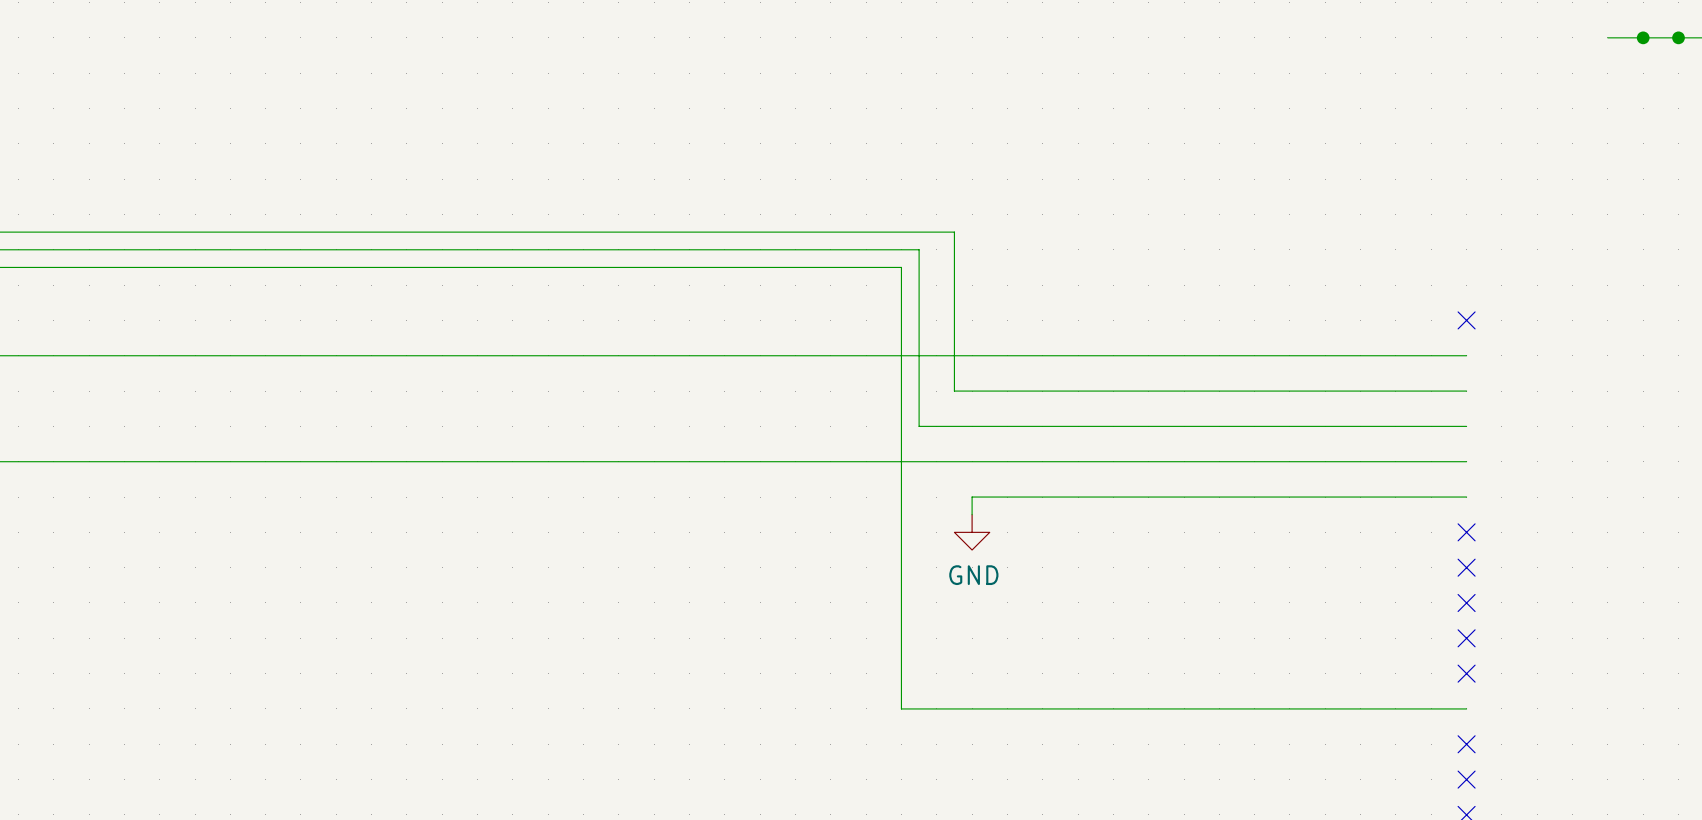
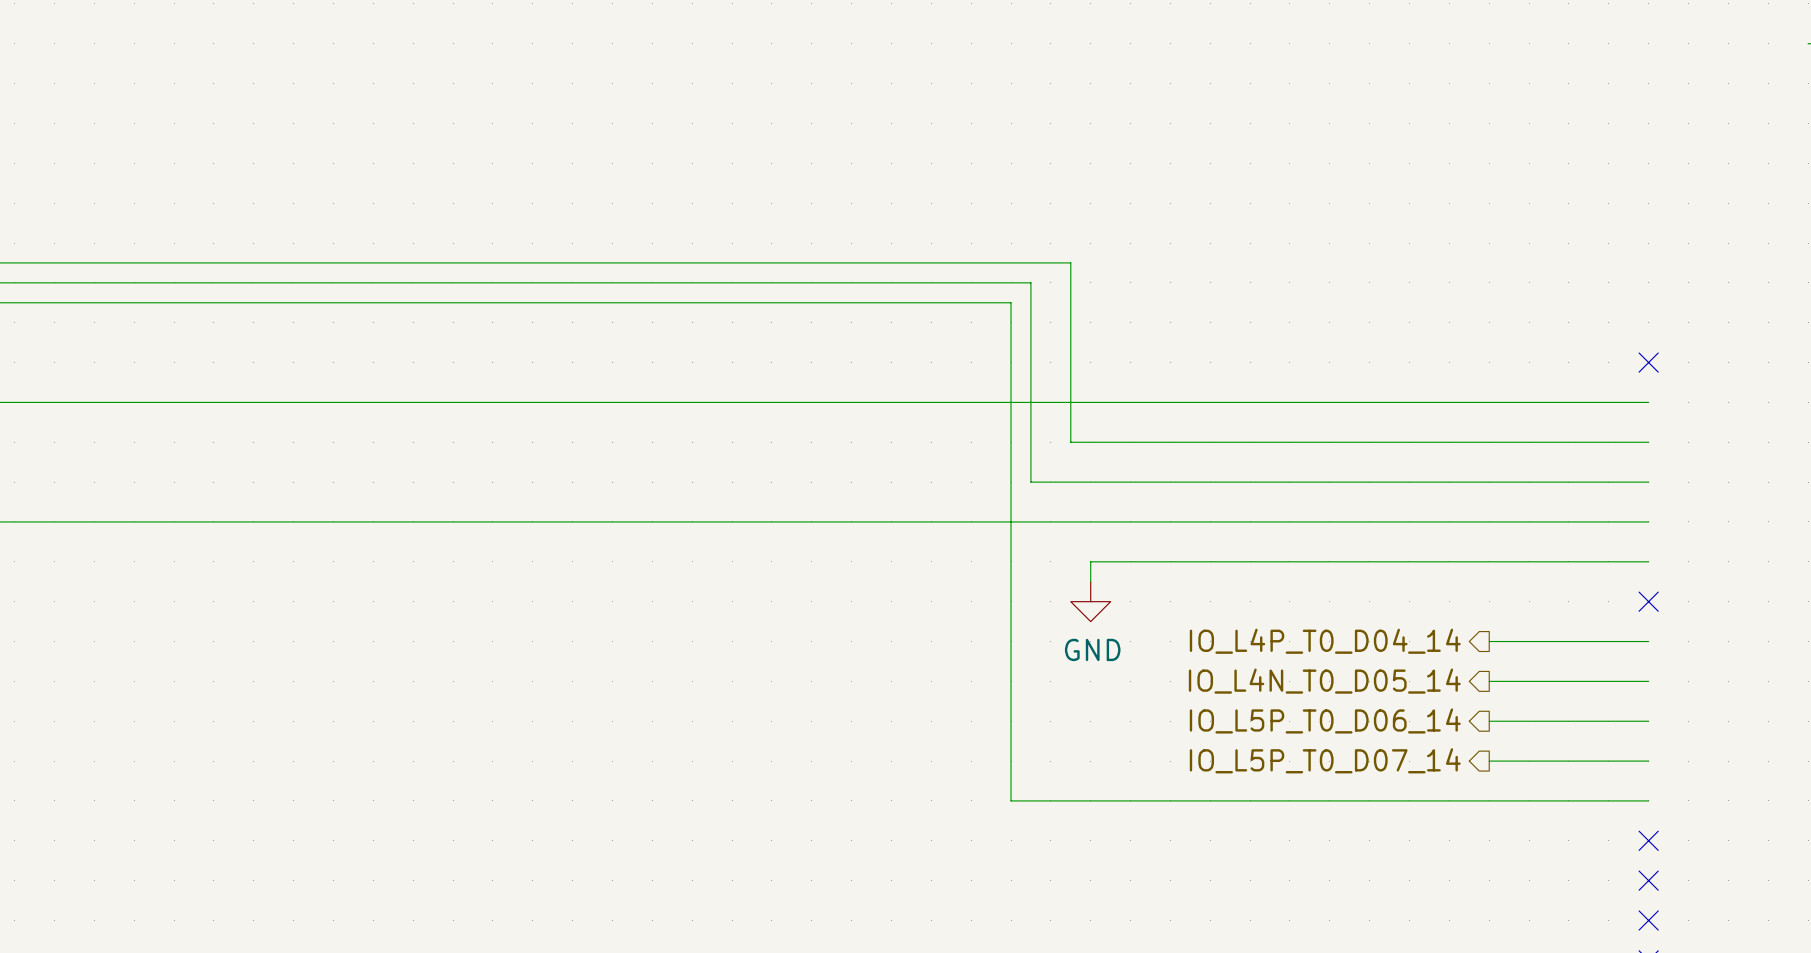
hierarchical label: none -> IO_L4P_T0_D04_14 (1325, 641)
wire: none -> (1489, 641) (1648, 641)
no-connect mark: (1466, 567) -> none
hierarchical label: none -> IO_L4N_T0_D05_14 (1324, 681)
wire: none -> (1489, 681) (1648, 681)
no-connect mark: (1466, 602) -> none
hierarchical label: none -> IO_L5P_T0_D06_14 (1325, 720)
wire: none -> (1489, 721) (1648, 721)
no-connect mark: (1466, 638) -> none
hierarchical label: none -> IO_L5P_T0_D07_14 (1325, 760)
wire: none -> (1489, 761) (1648, 761)
no-connect mark: (1466, 673) -> none

